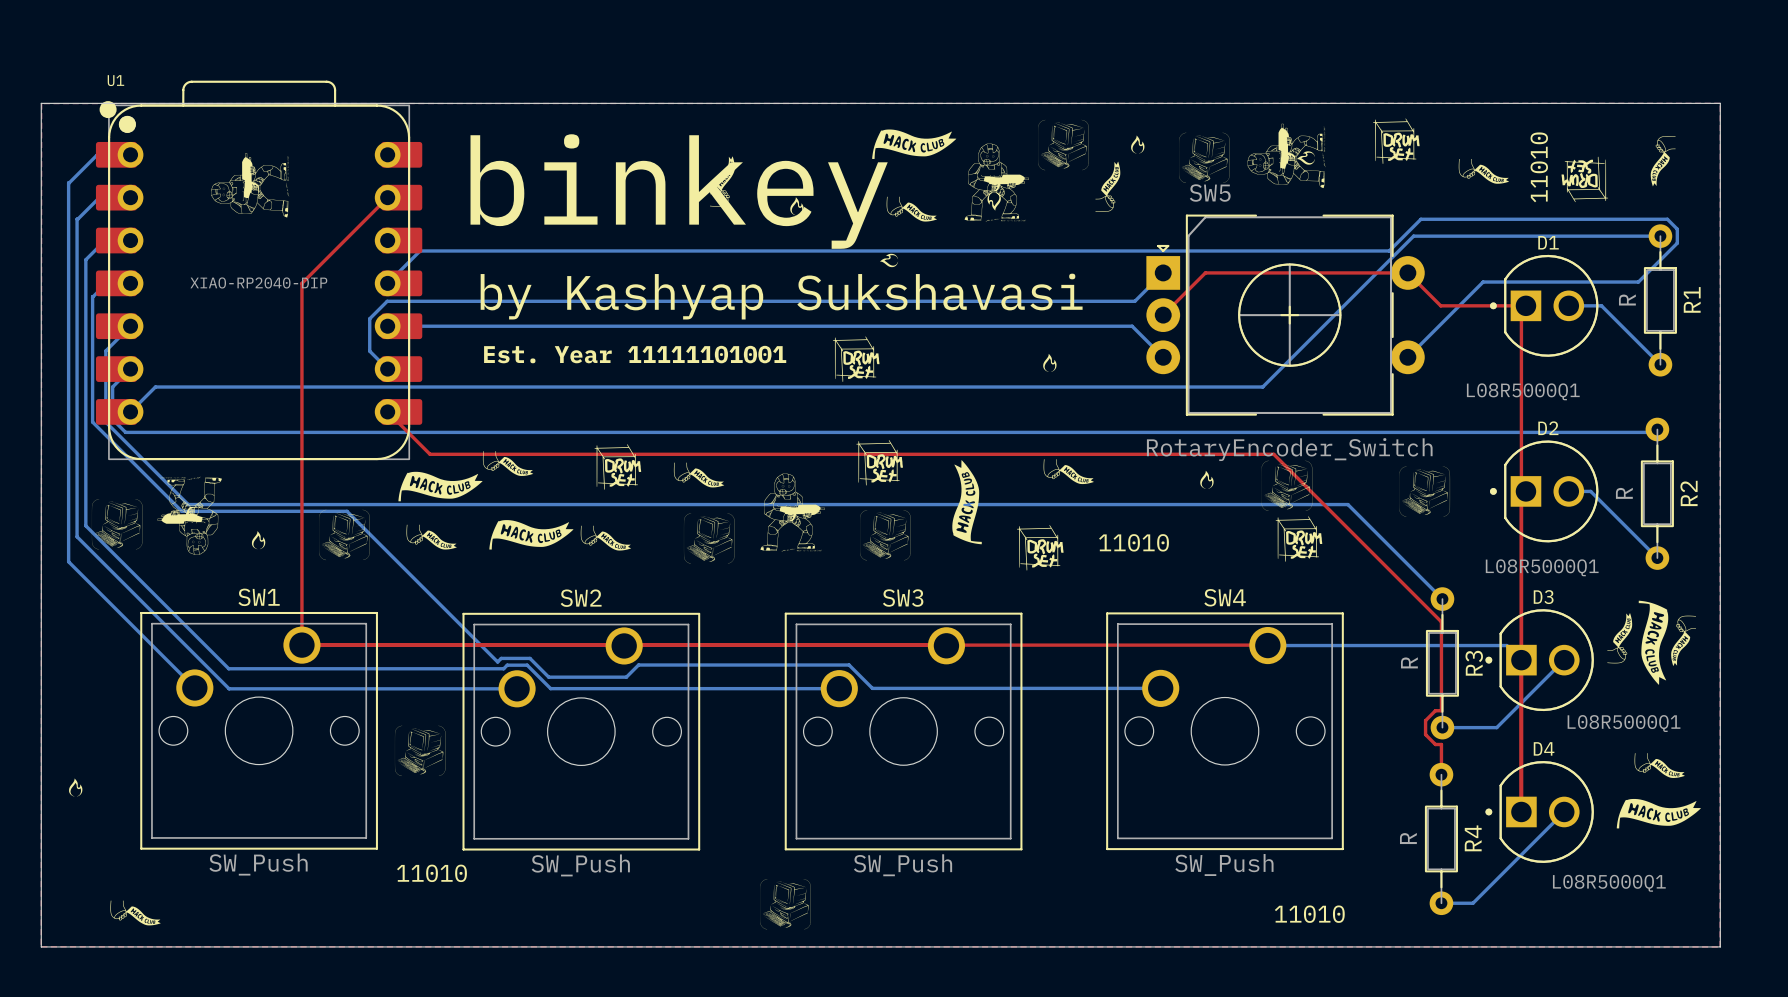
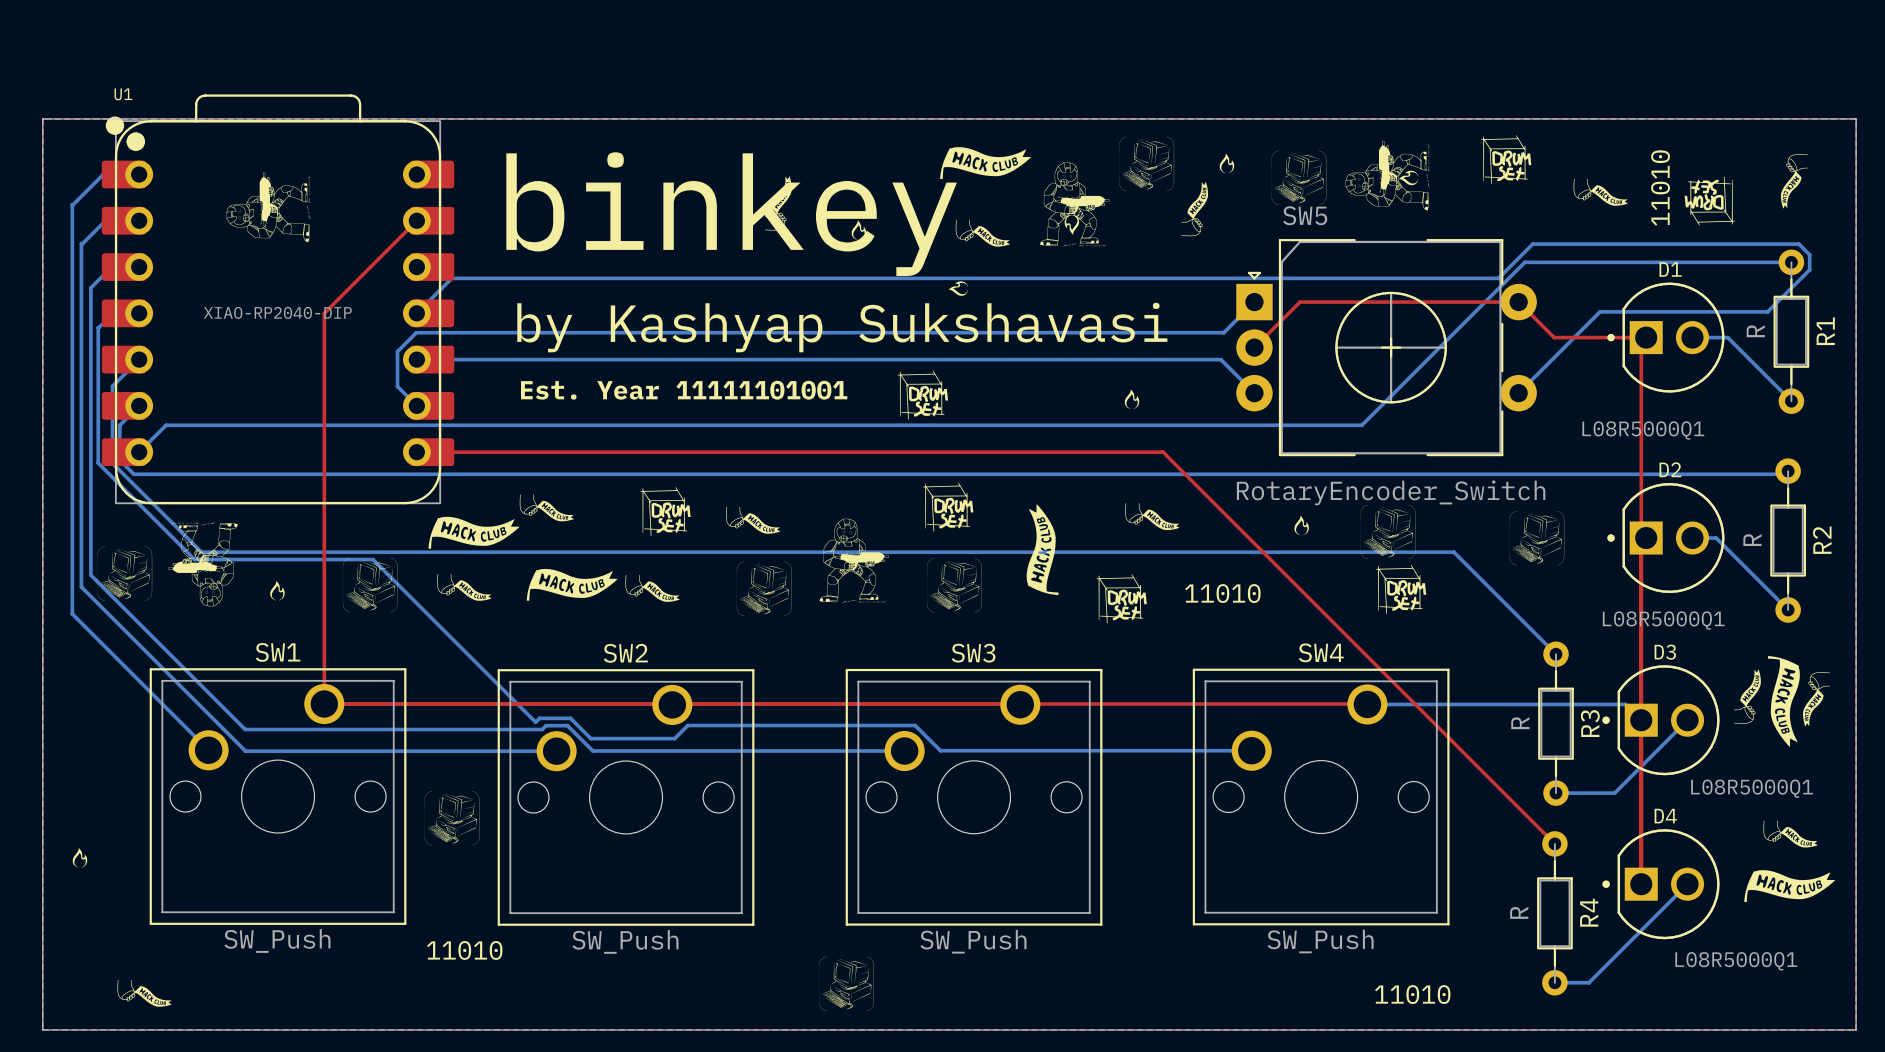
top track: (387, 411) (430, 454) (1273, 454) (1441, 621) (1441, 710) (1435, 710) (1425, 720) (1425, 734) (1435, 744) (1441, 744) (1441, 774) -> (416, 452) (1163, 452) (1554, 843)

